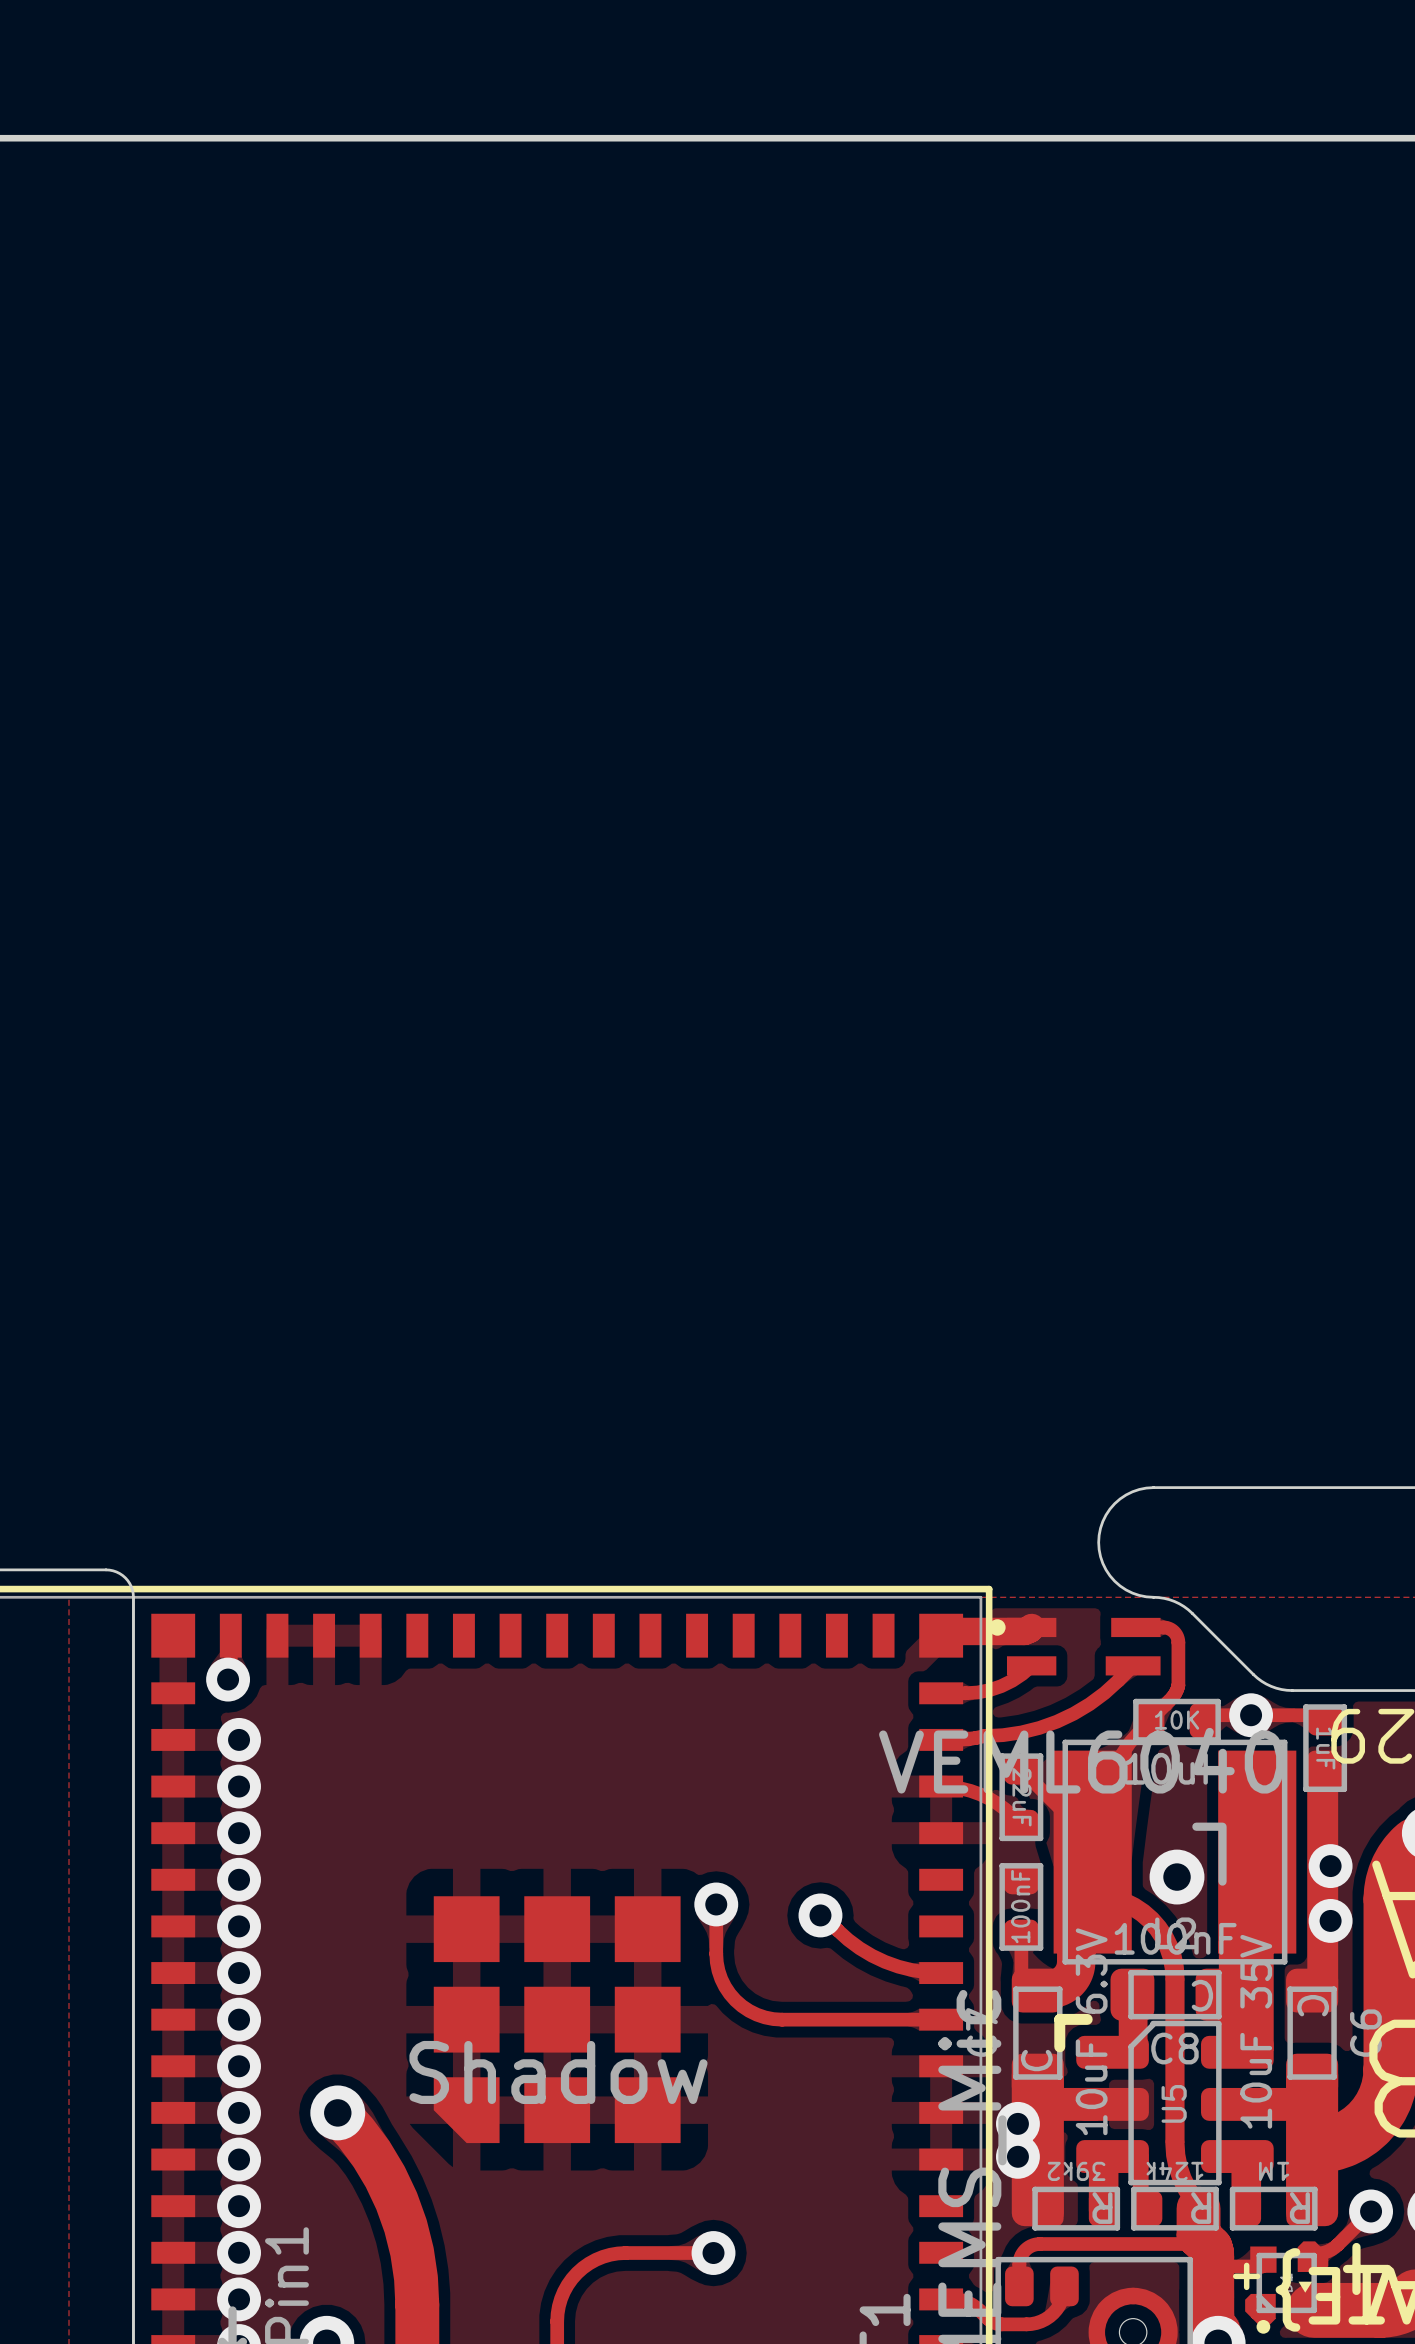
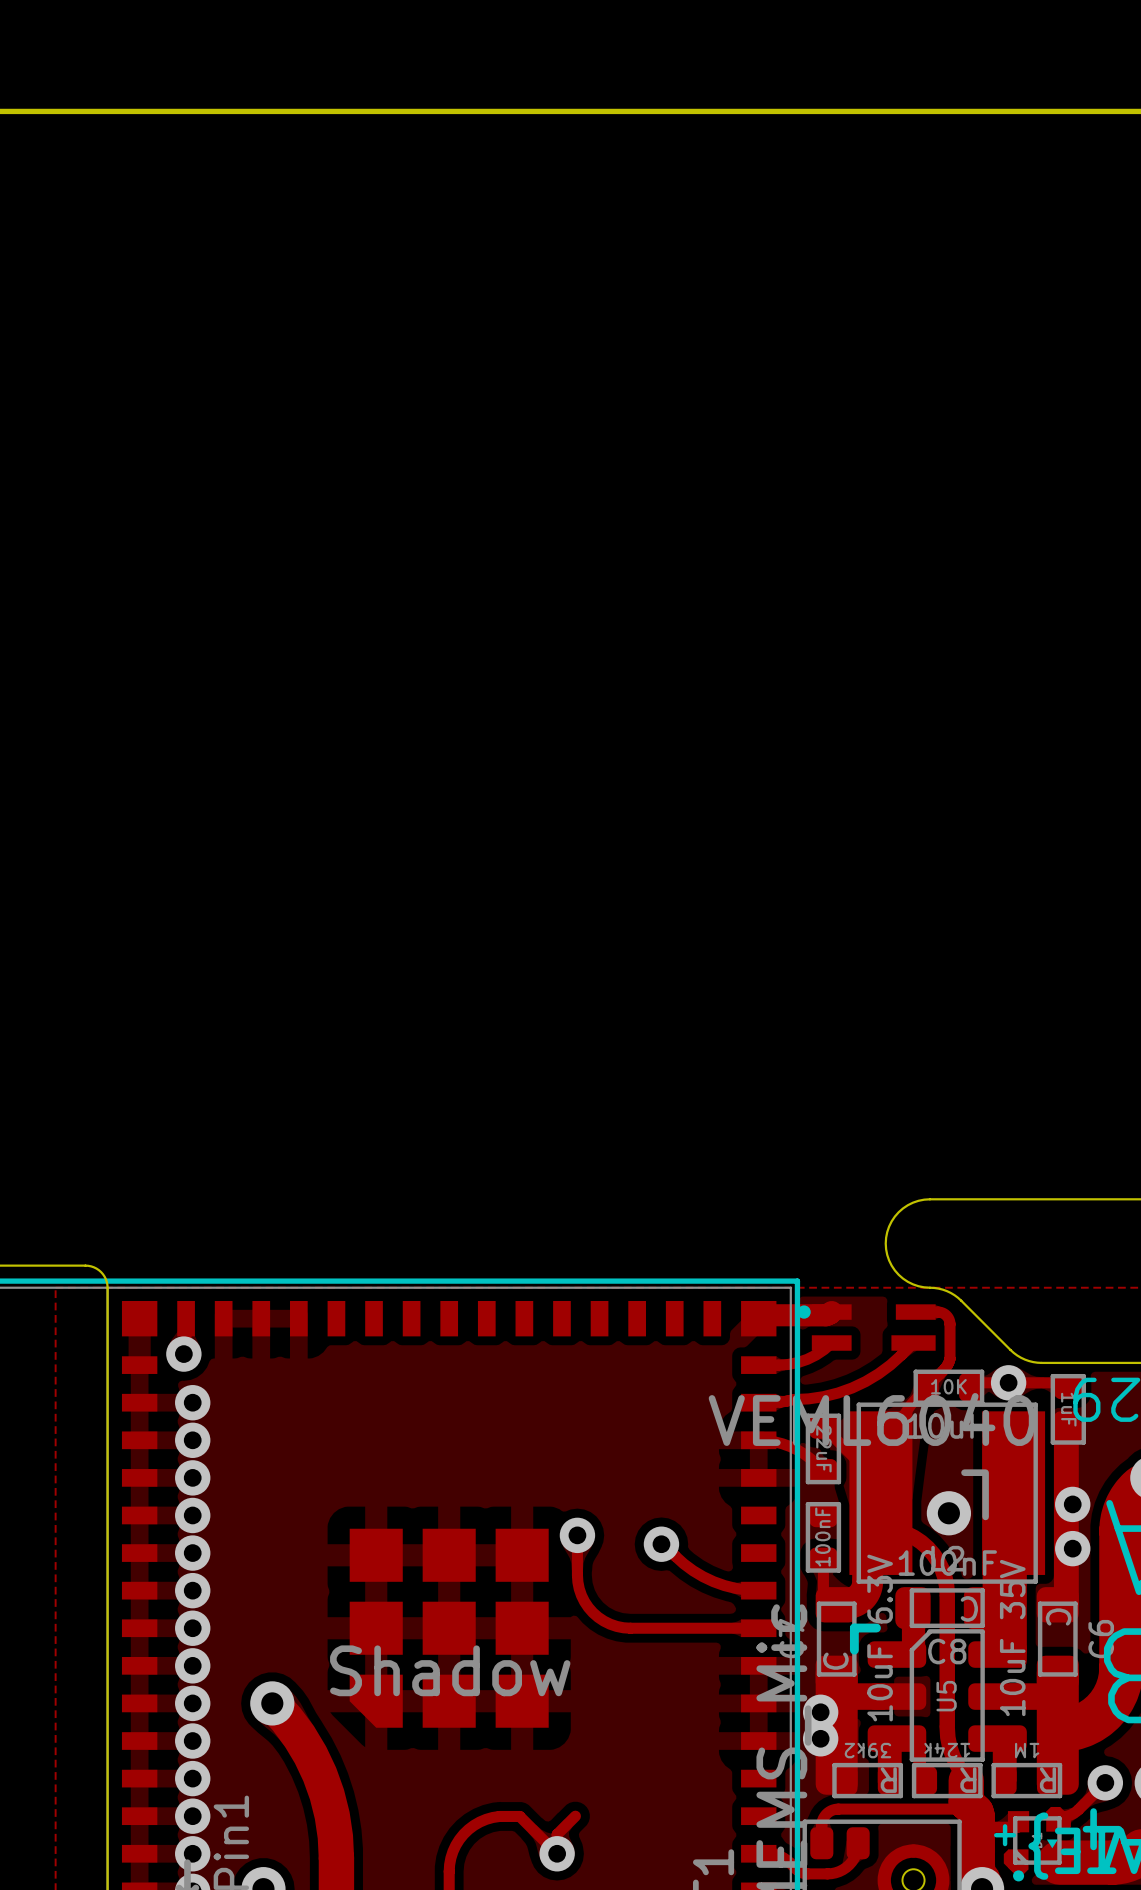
track: (713, 2253) (617, 2253) (595, 2259) (582, 2267) (567, 2285) (561, 2298) (557, 2321) -> (575, 1816) (557, 1834) (557, 1853) (519, 1816) (499, 1816) (479, 1822) (468, 1829) (459, 1839) (450, 1857) (449, 1871)
via position: (713, 2253) -> (557, 1853)

